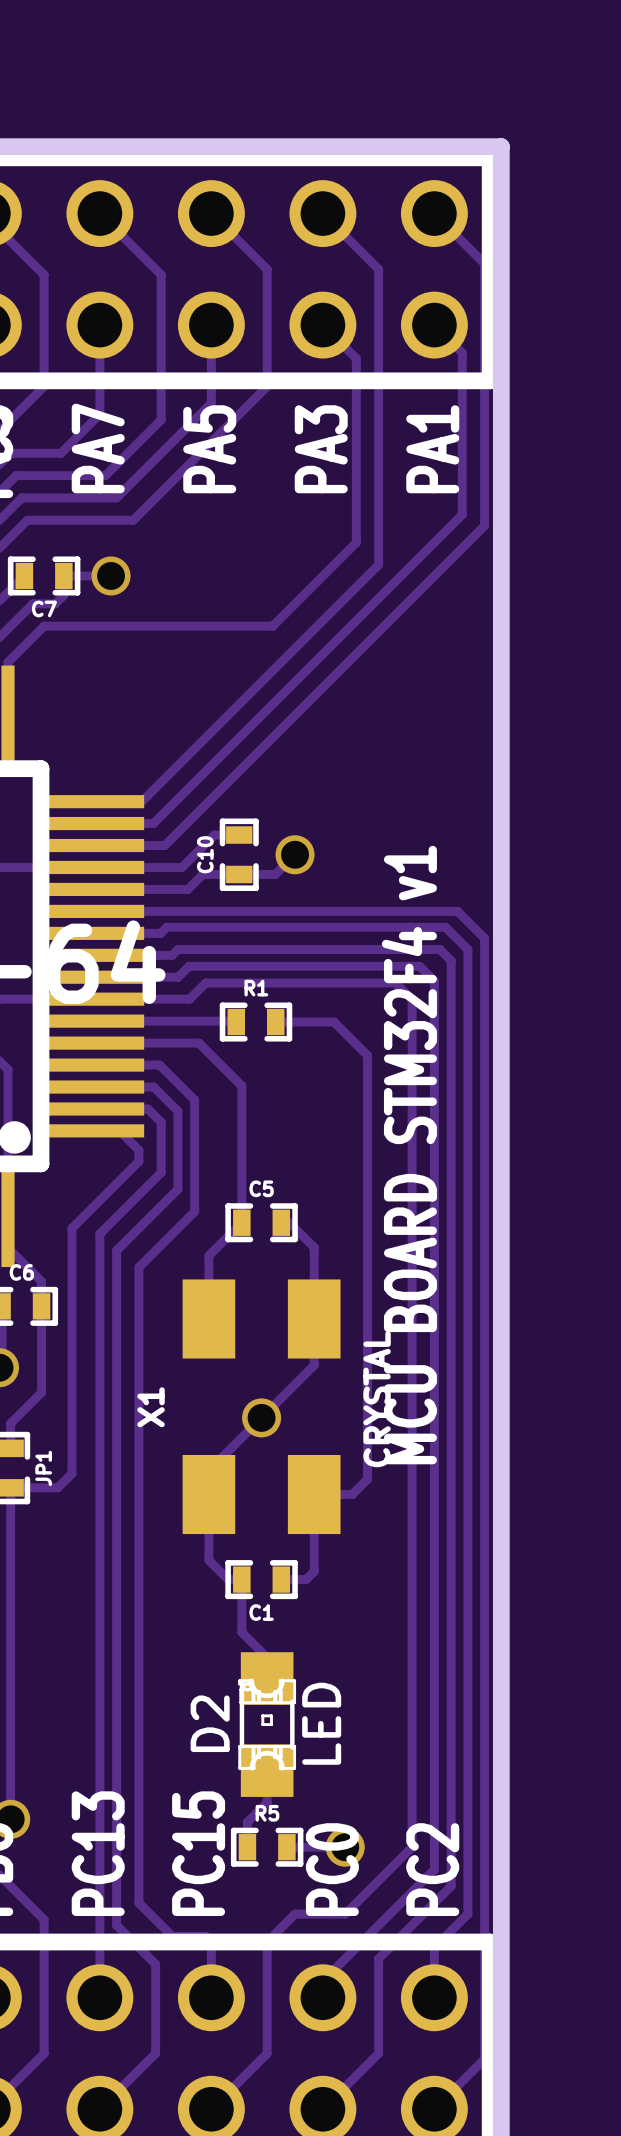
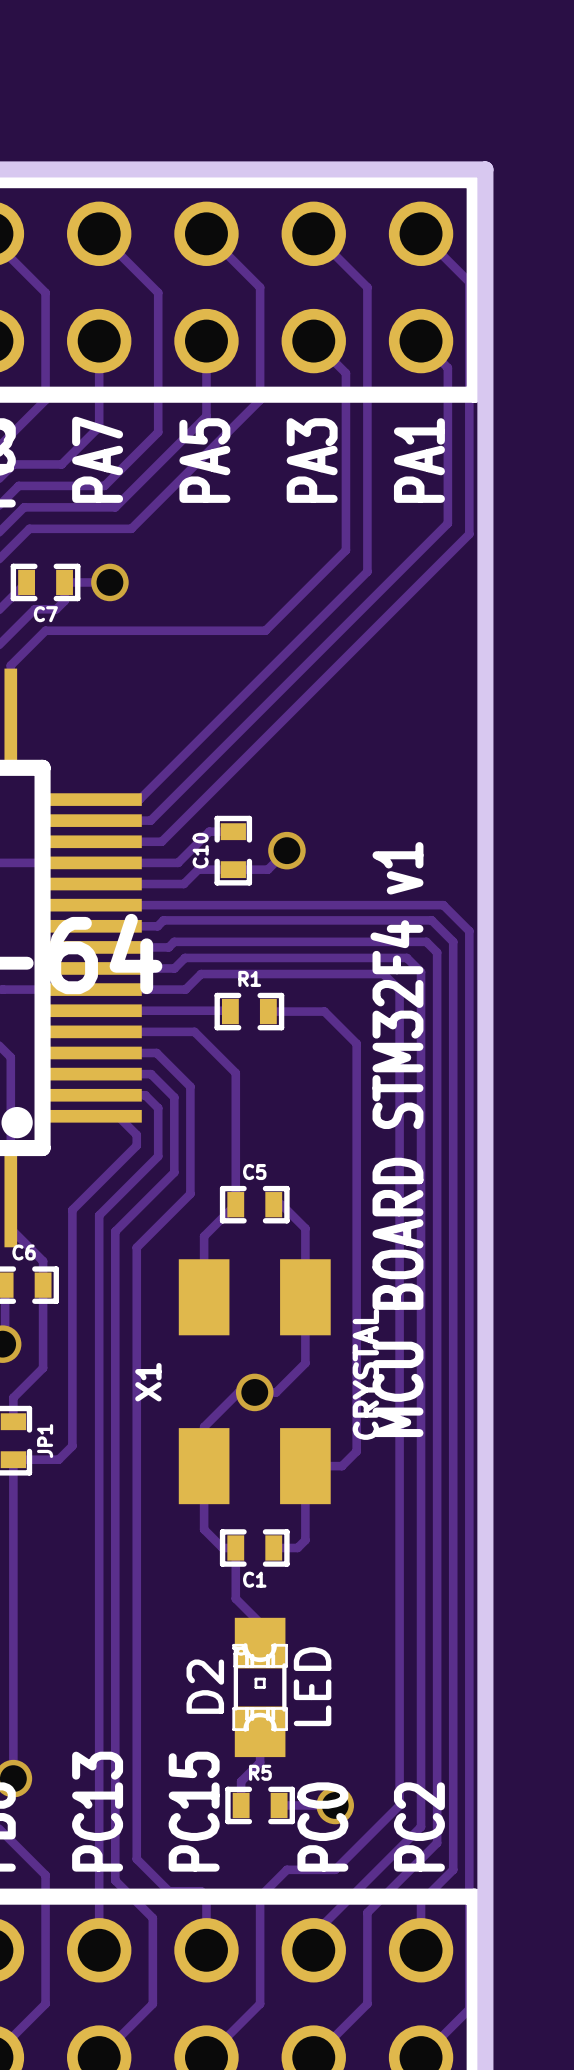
track: (314, 1365) (208, 1470) -> (305, 1341) (305, 1363) (276, 1392) (238, 1392) (204, 1426) (204, 1443)

